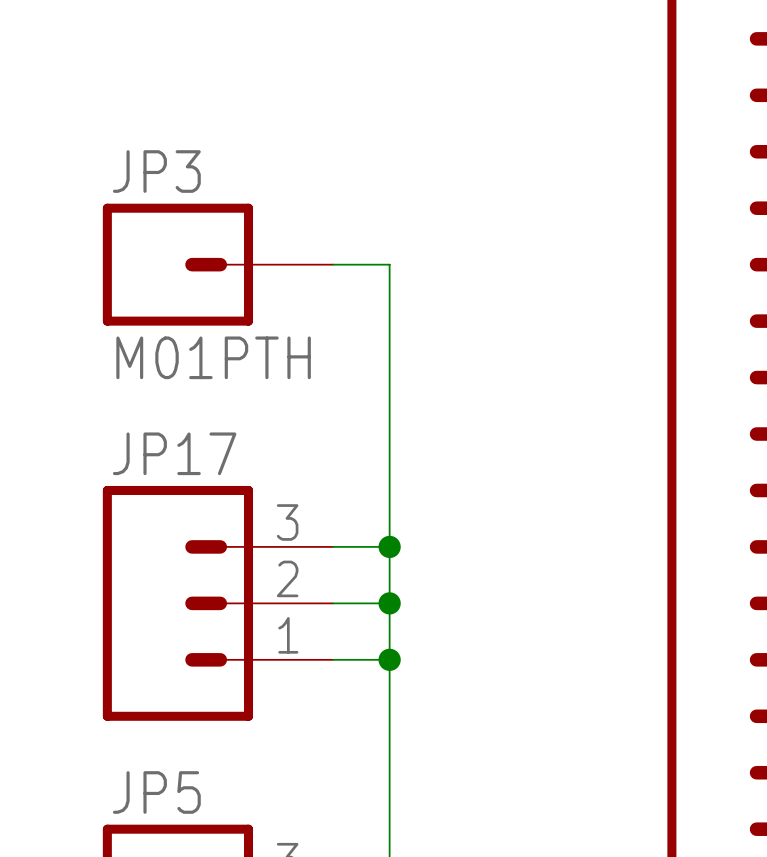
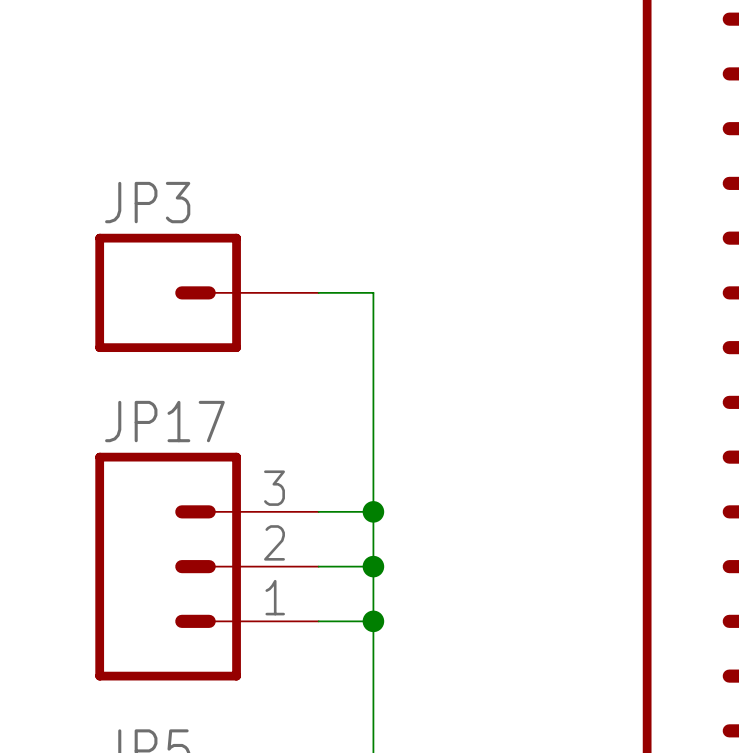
JP3 position: (218, 264) -> (206, 292)
wire: (333, 264) (389, 264) (389, 321) -> (318, 292) (373, 292)
JP3 value: M01PTH (213, 357) -> none

